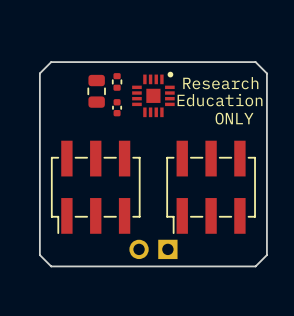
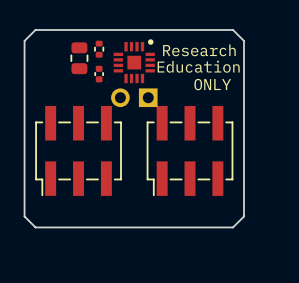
part position: (153, 249) -> (134, 97)

